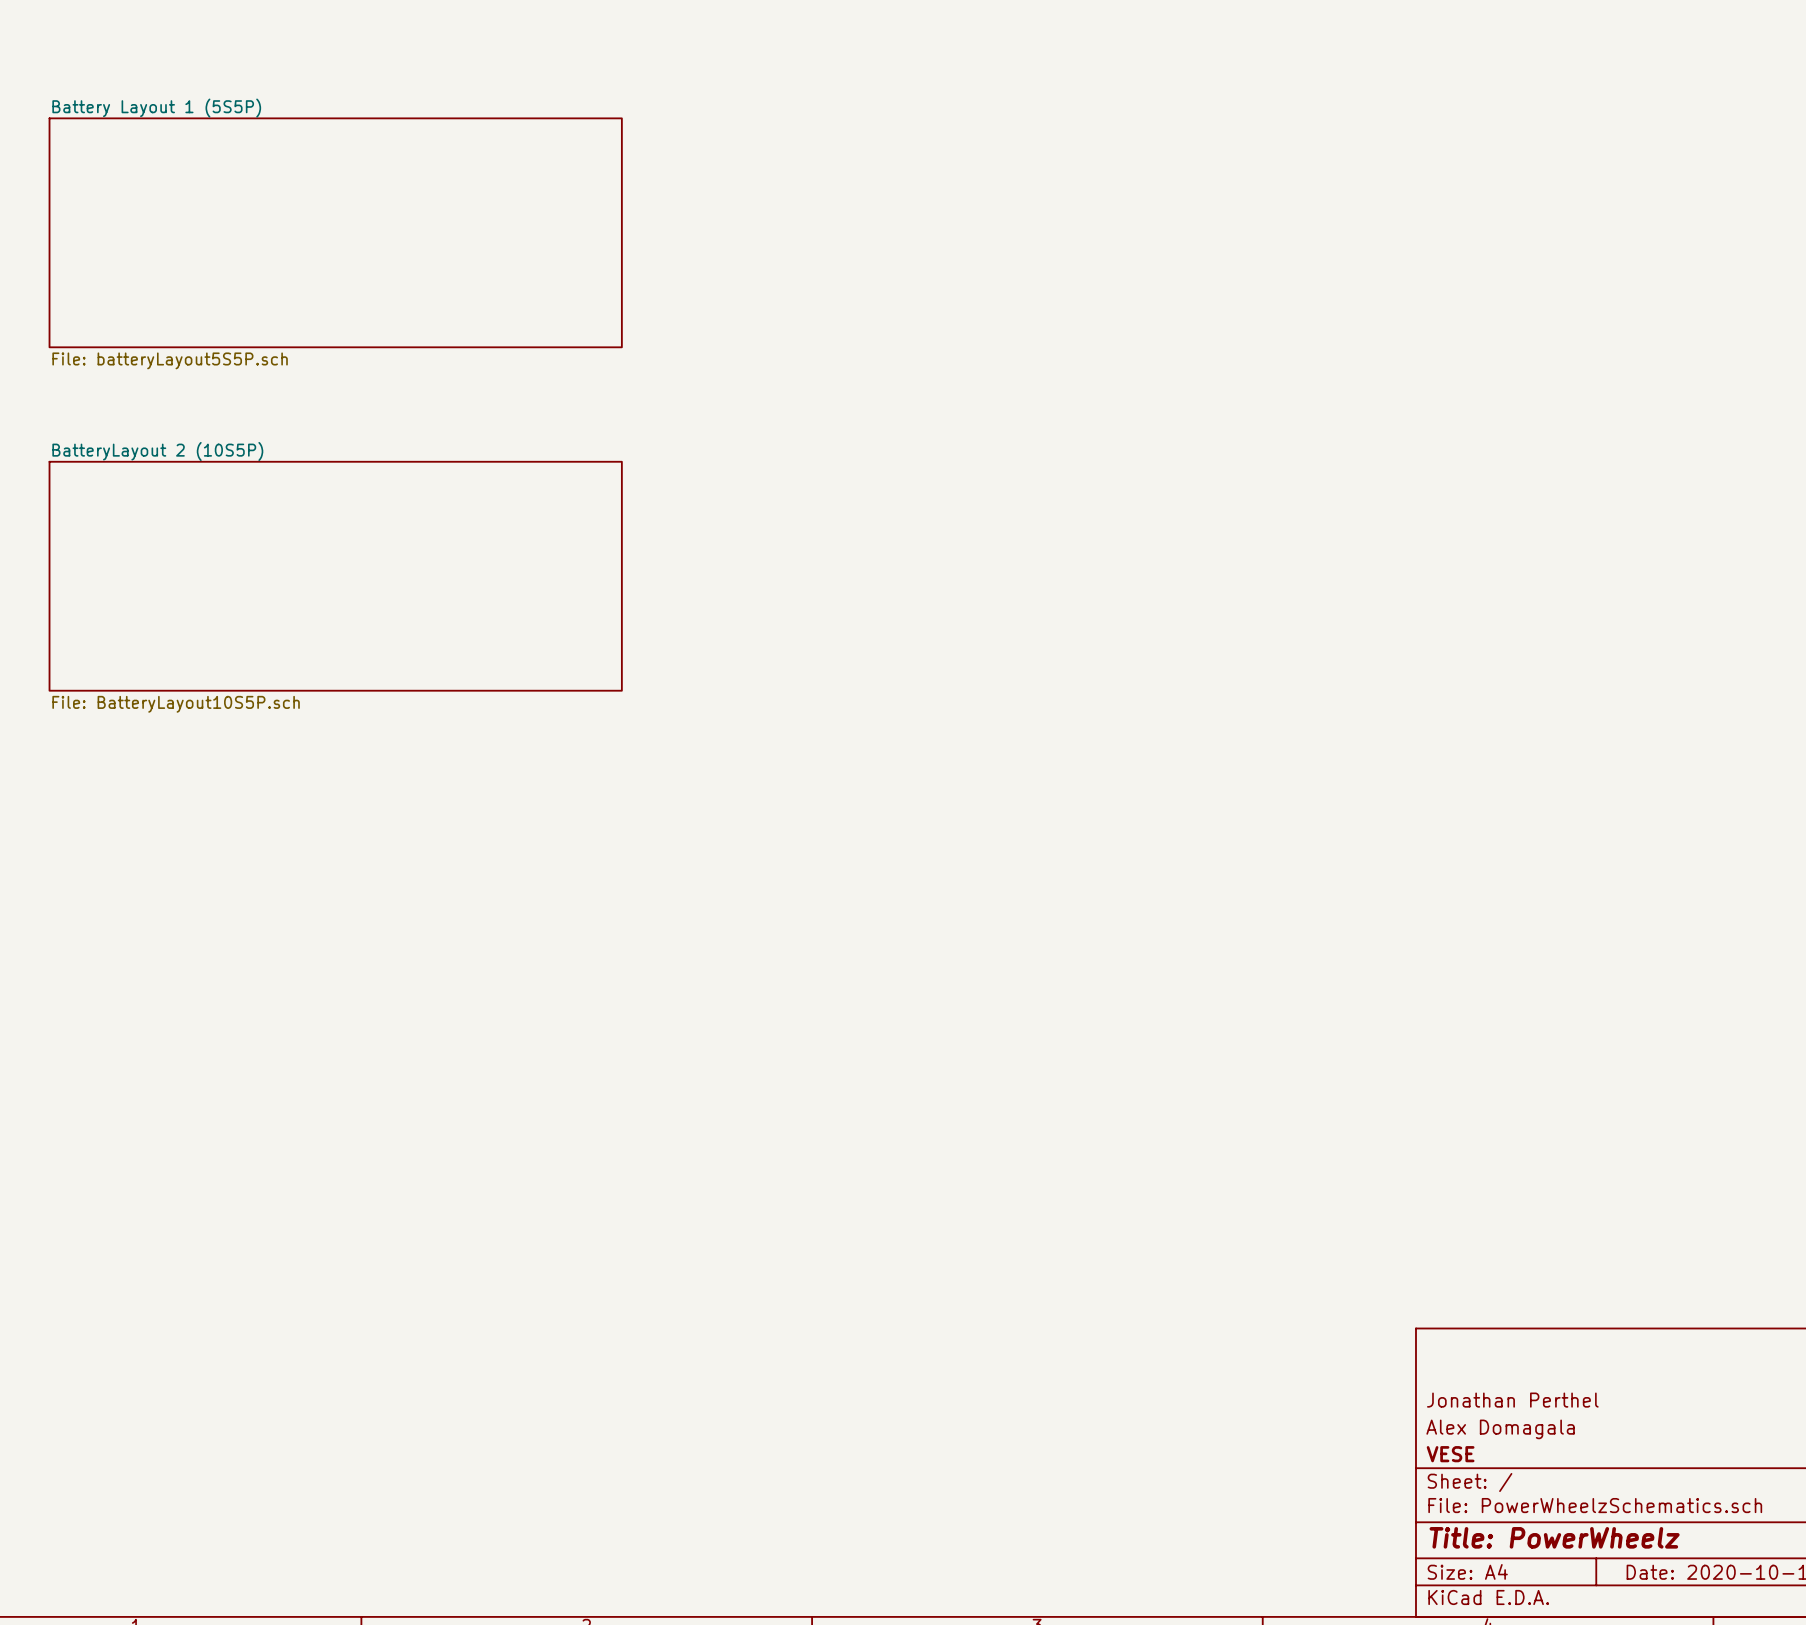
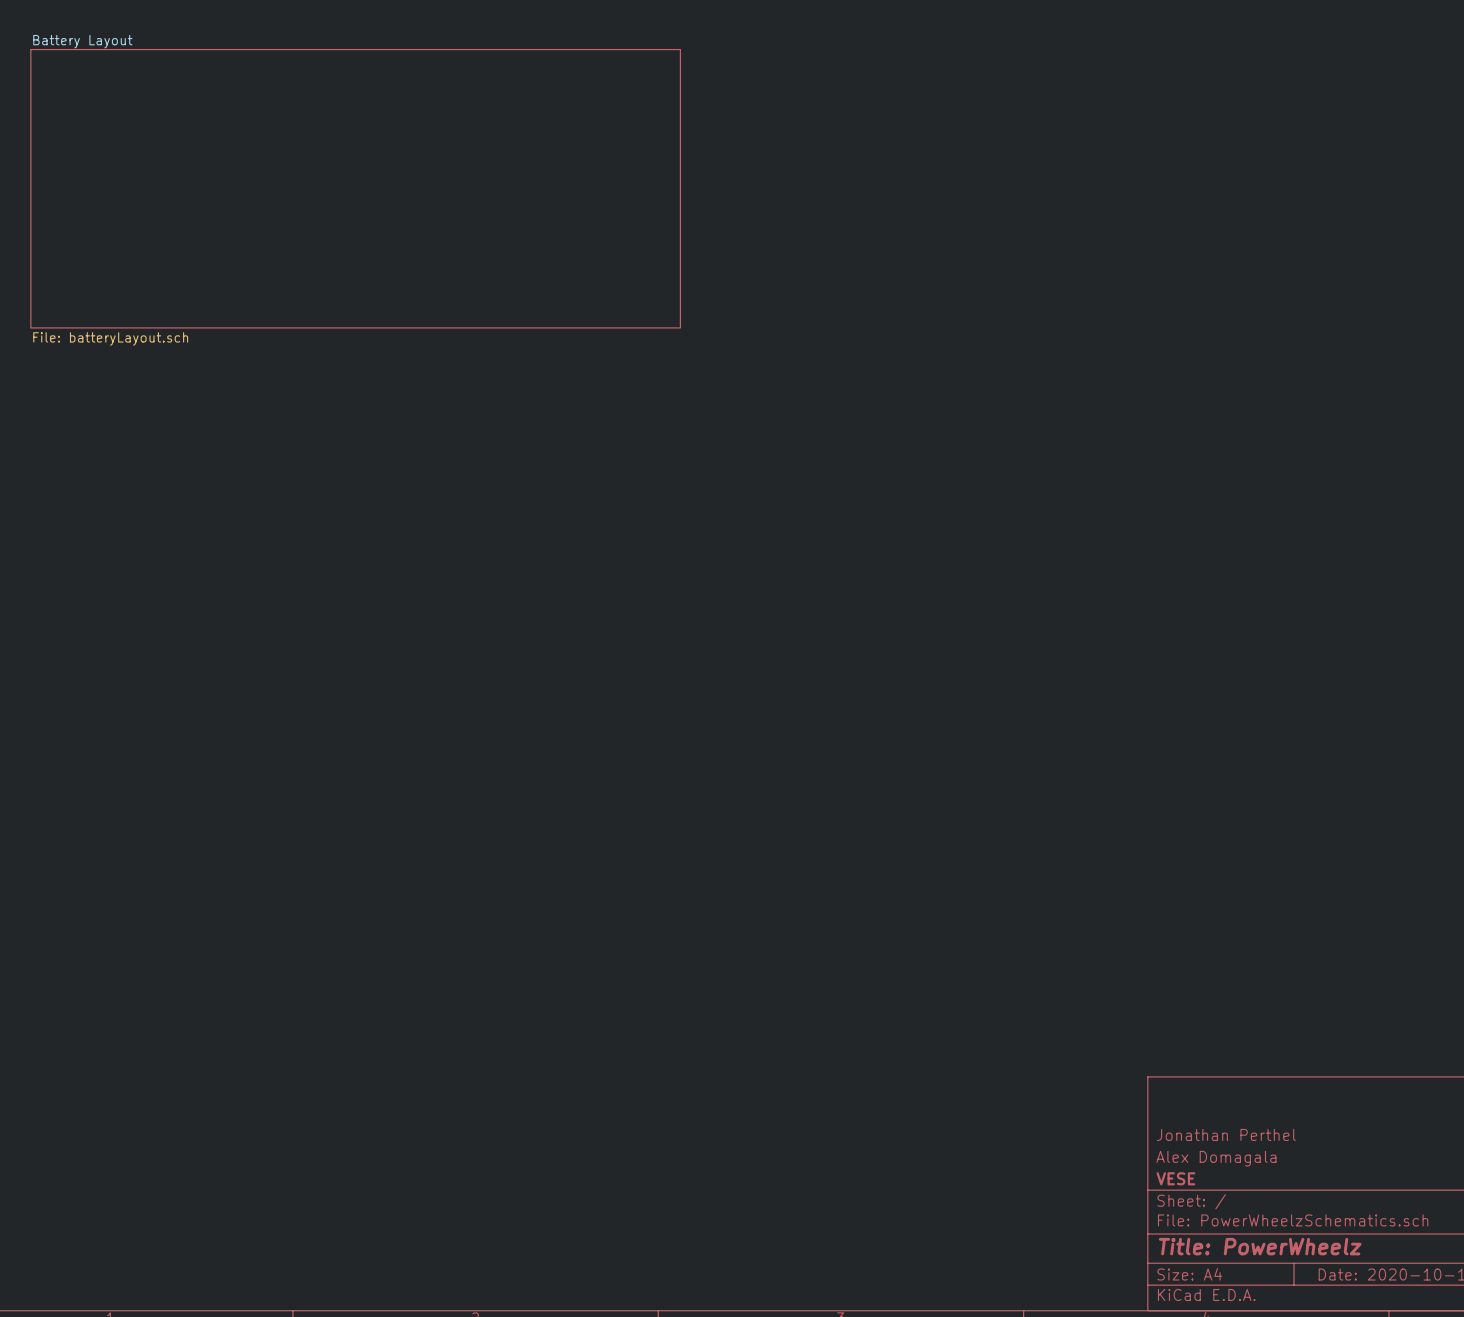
sheet Battery Layout 1 (5S5P): File: batteryLayout5S5P.sch (335, 232) -> none
sheet Battery Layout: none -> File: batteryLayout.sch (355, 188)
sheet BatteryLayout 2 (10S5P): File: BatteryLayout10S5P.sch (335, 576) -> none

